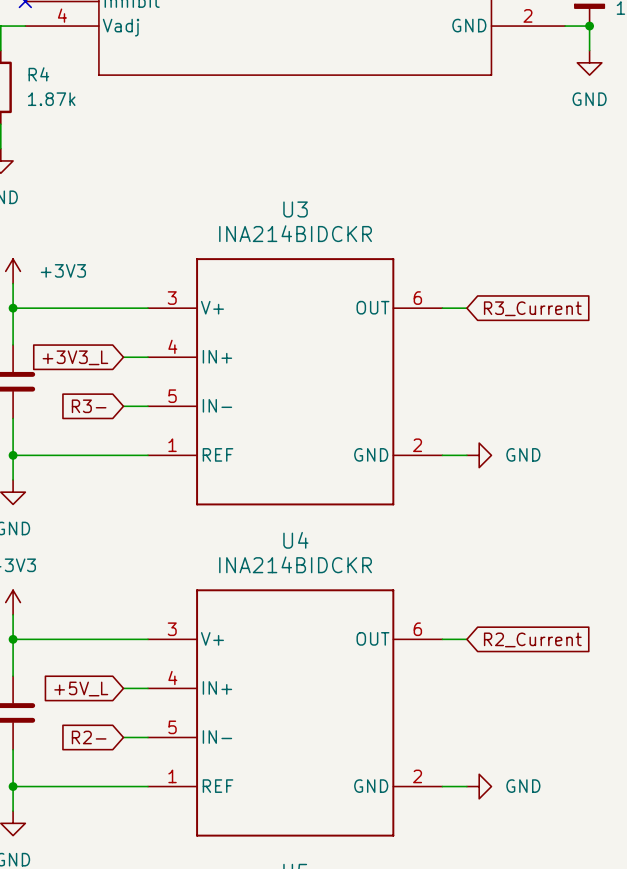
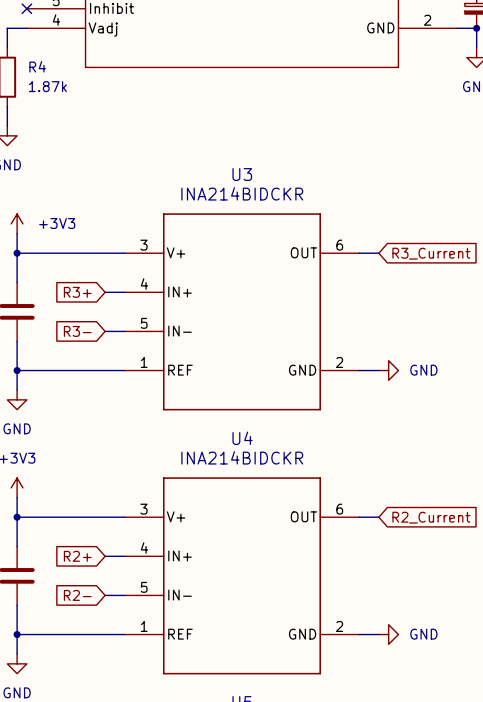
global label: +3V3_L (75, 357) -> R3+ (77, 292)
global label: +5V_L (81, 689) -> R2+ (77, 556)

